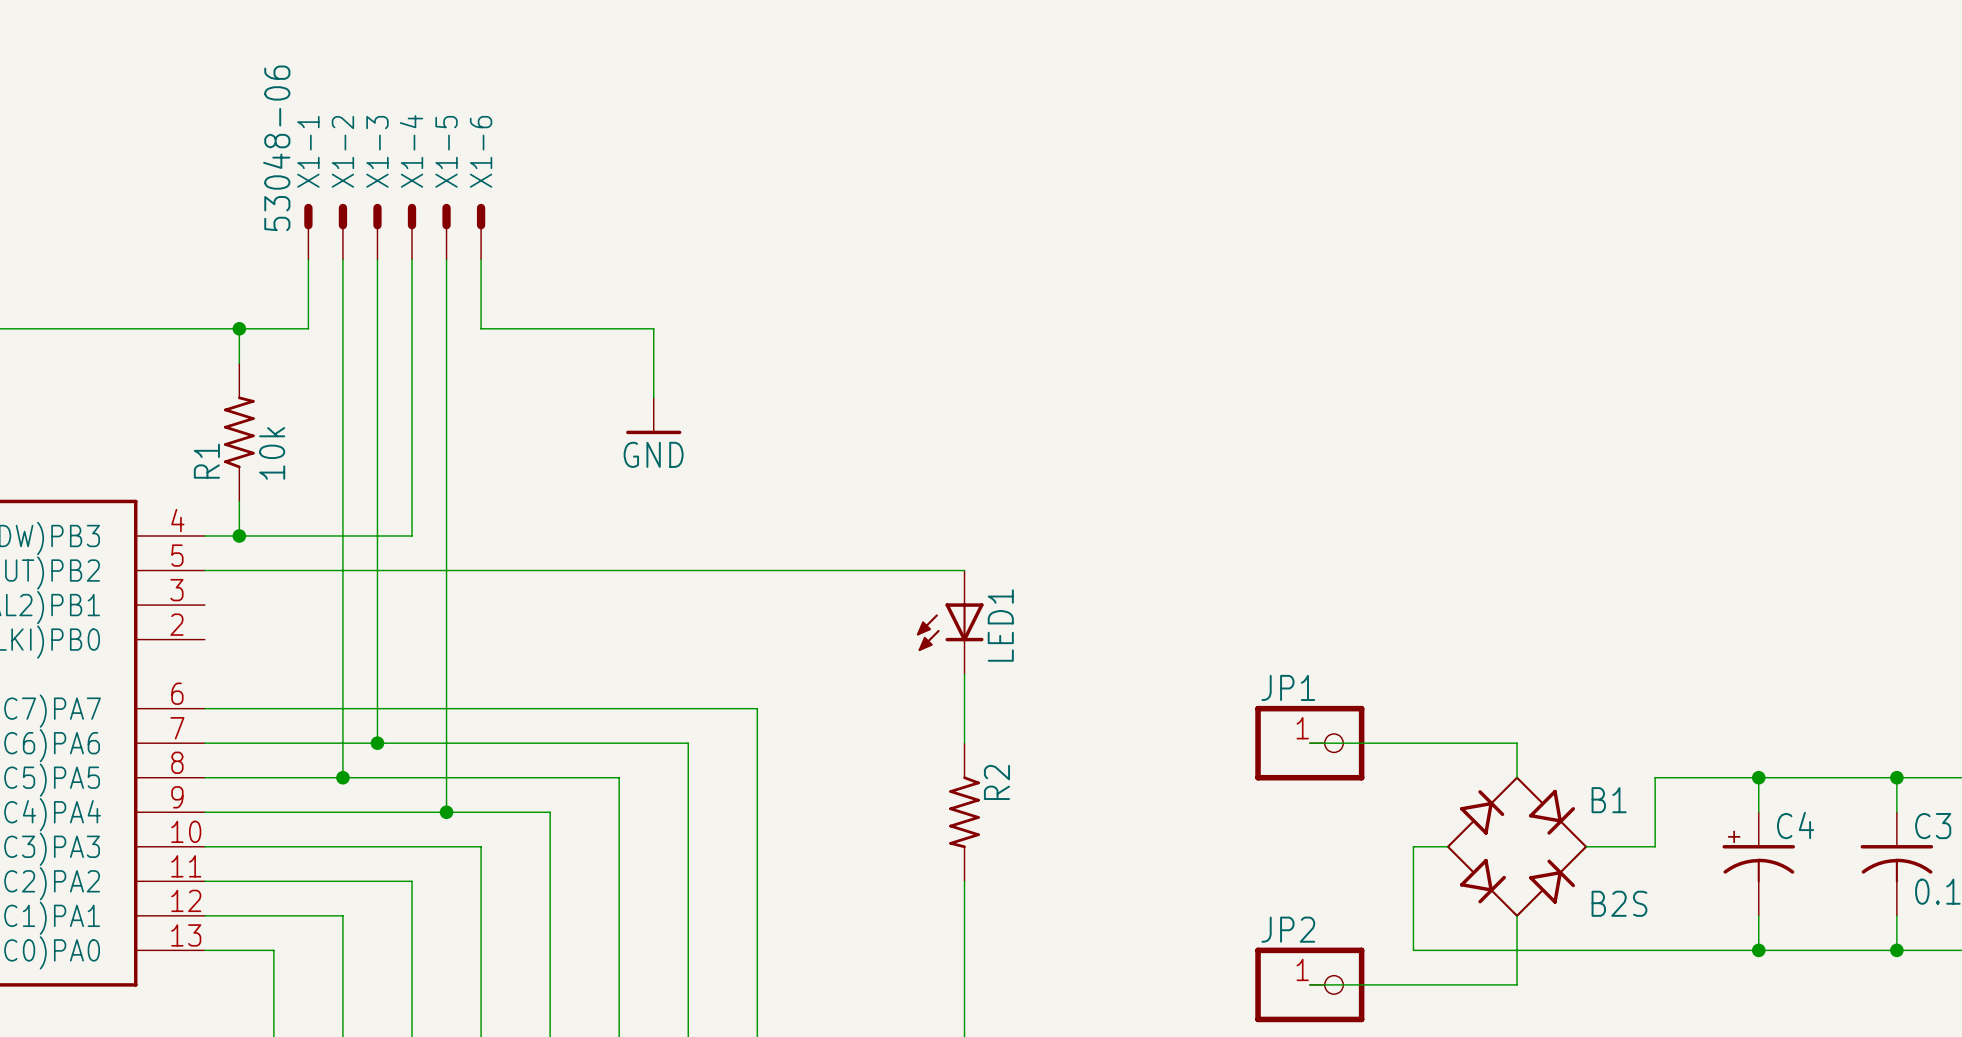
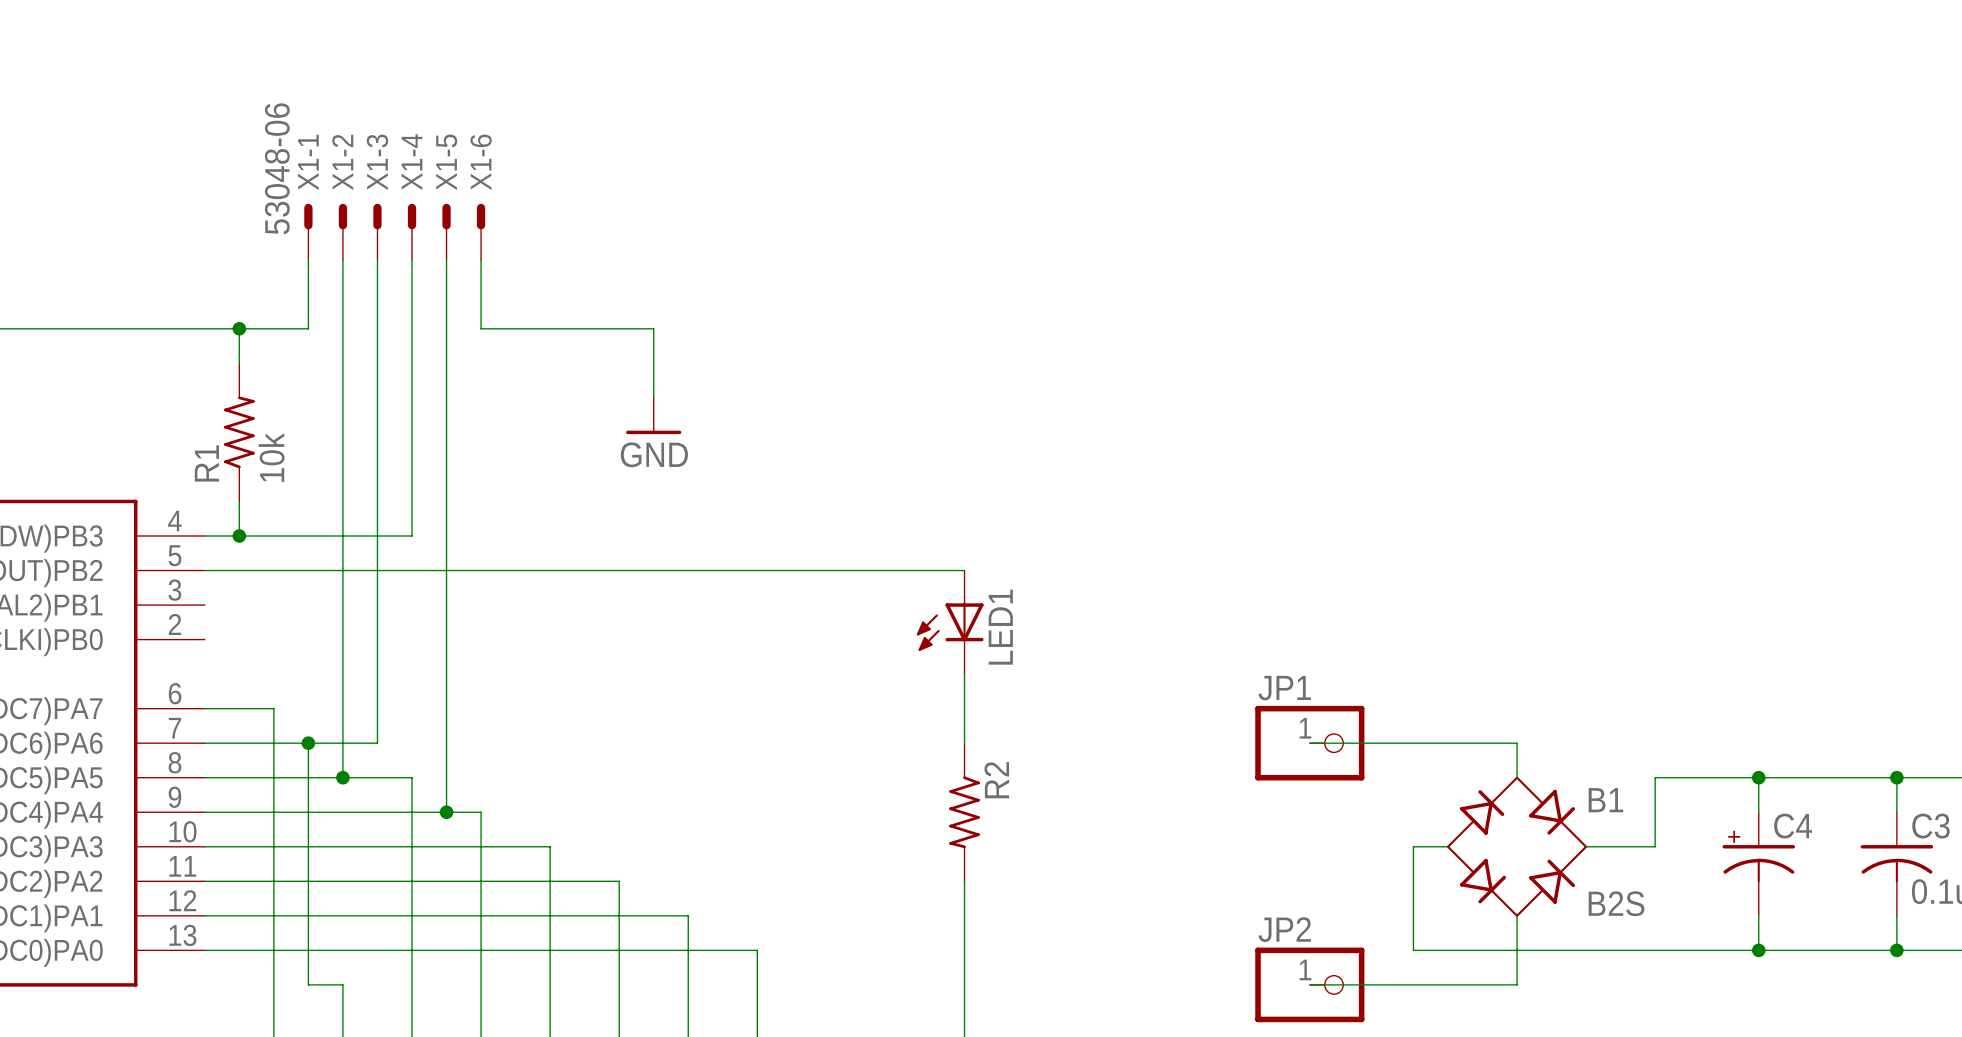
wire: (273, 708) (757, 708) (757, 950) -> (273, 708) (273, 950) (757, 950)
wire: (377, 743) (688, 743) (688, 915) -> (342, 915) (688, 915)
junction position: (377, 743) -> (308, 743)
wire: (412, 777) (619, 777) (619, 881) -> (412, 777) (412, 881) (619, 881)
wire: (481, 812) (550, 812) (550, 846) -> (481, 812) (481, 846) (550, 846)
wire: (342, 915) (342, 984) -> (308, 743) (308, 984) (342, 984)

